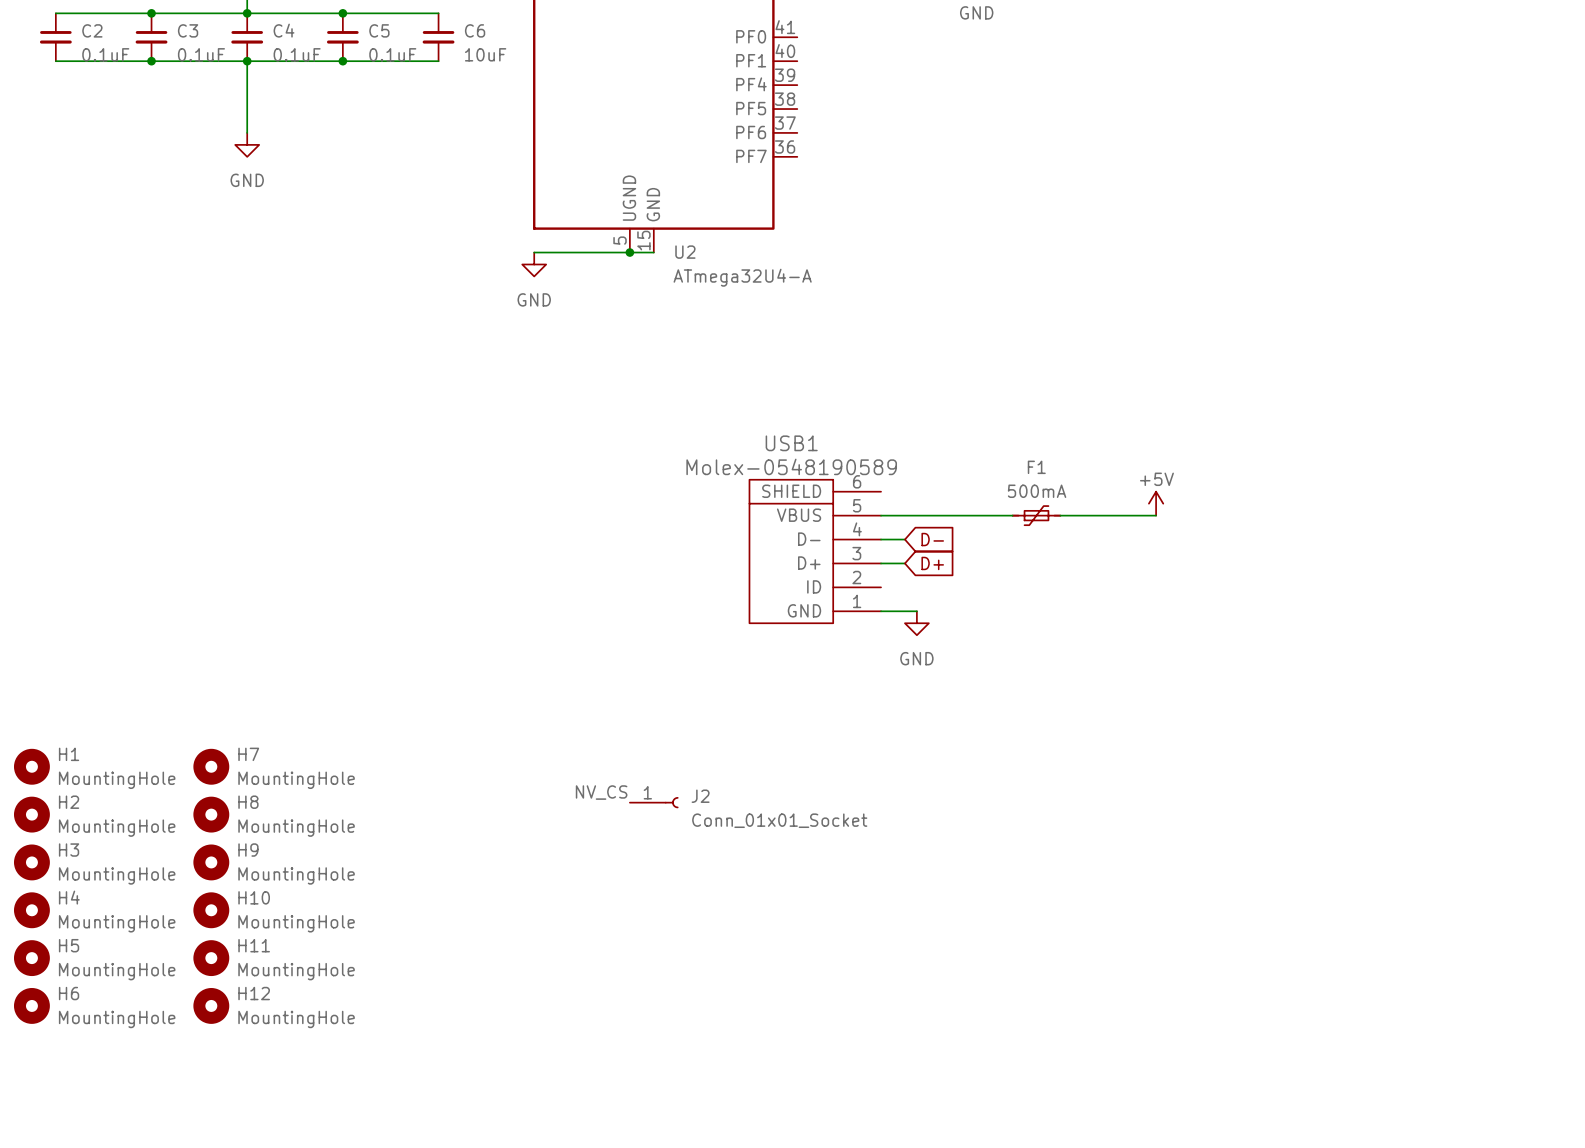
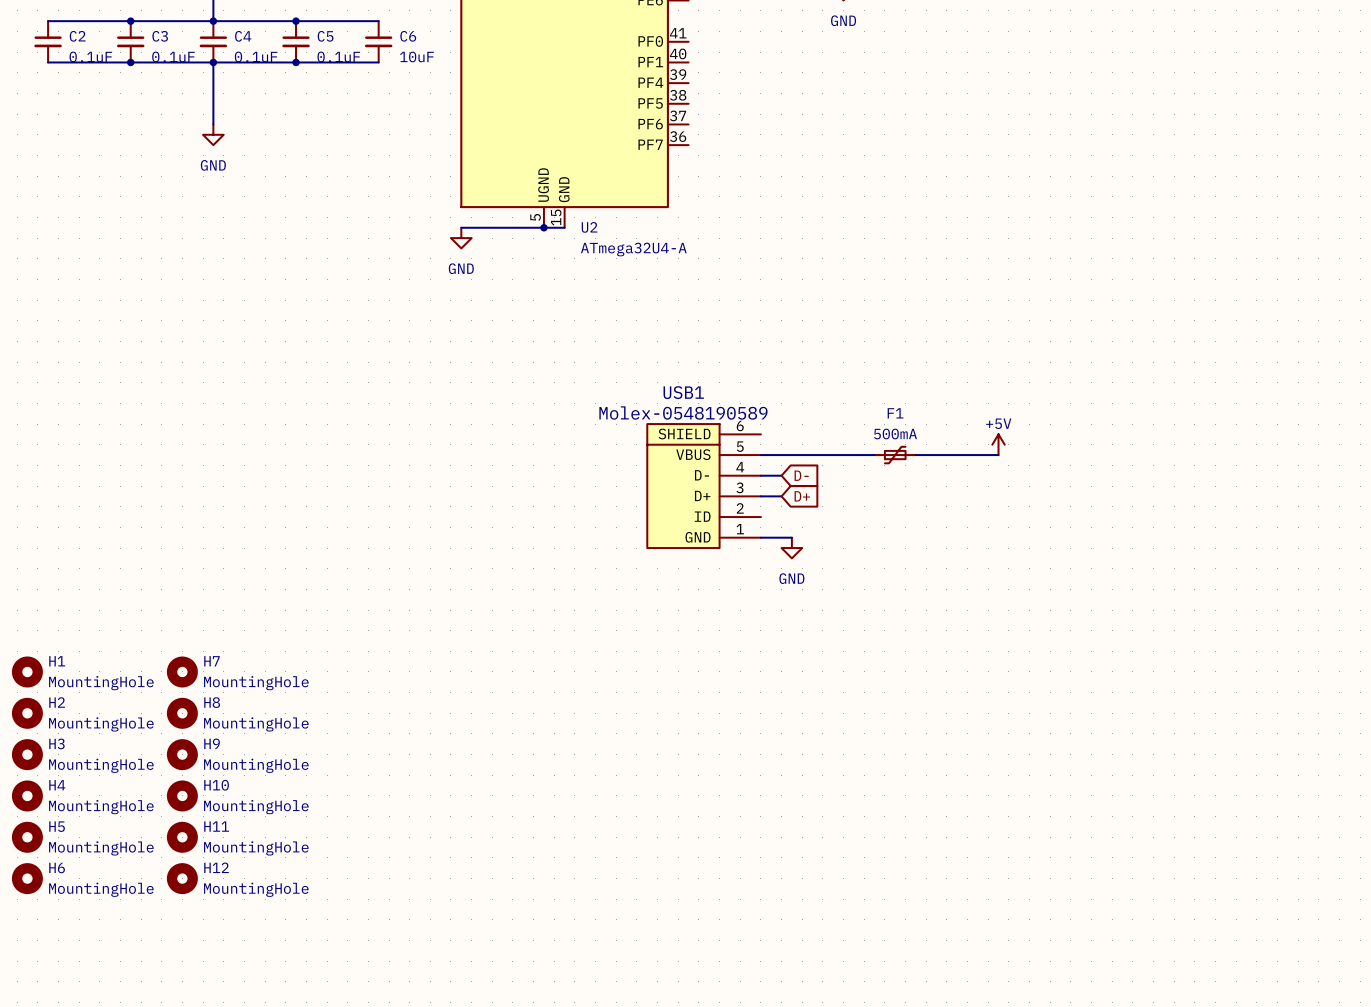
label: NV_CS (601, 792) -> none
J2: Conn_01x01_Socket (654, 802) -> none

